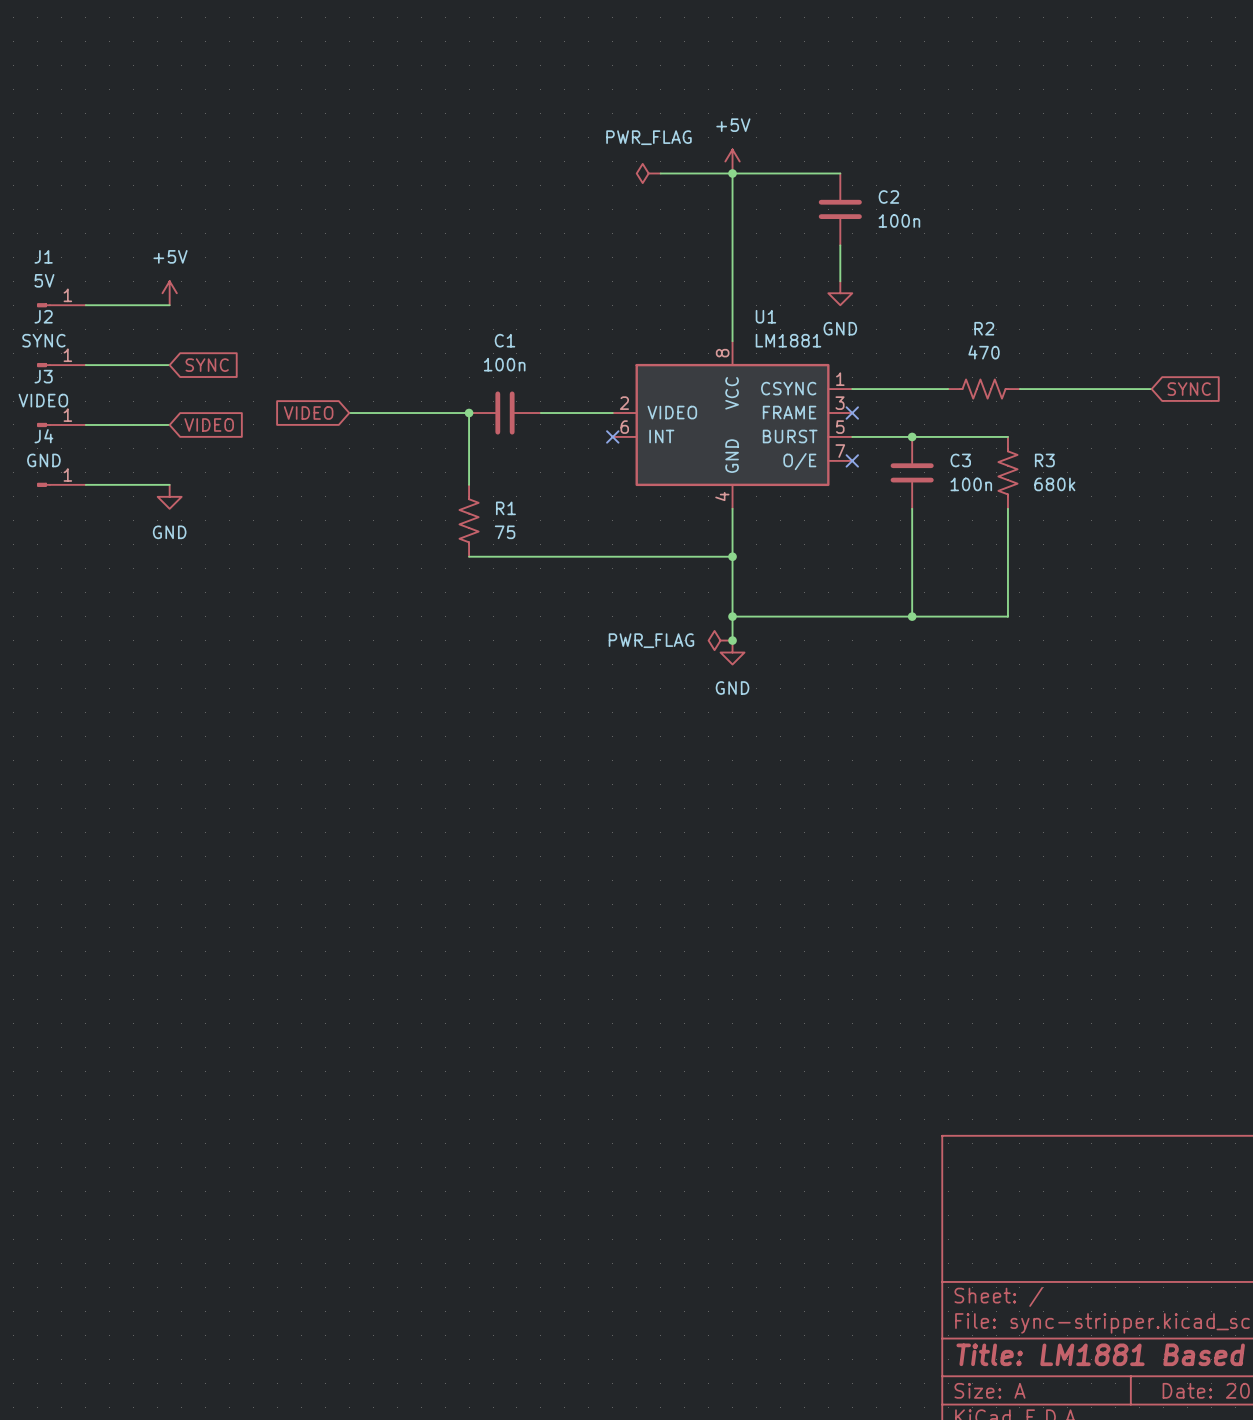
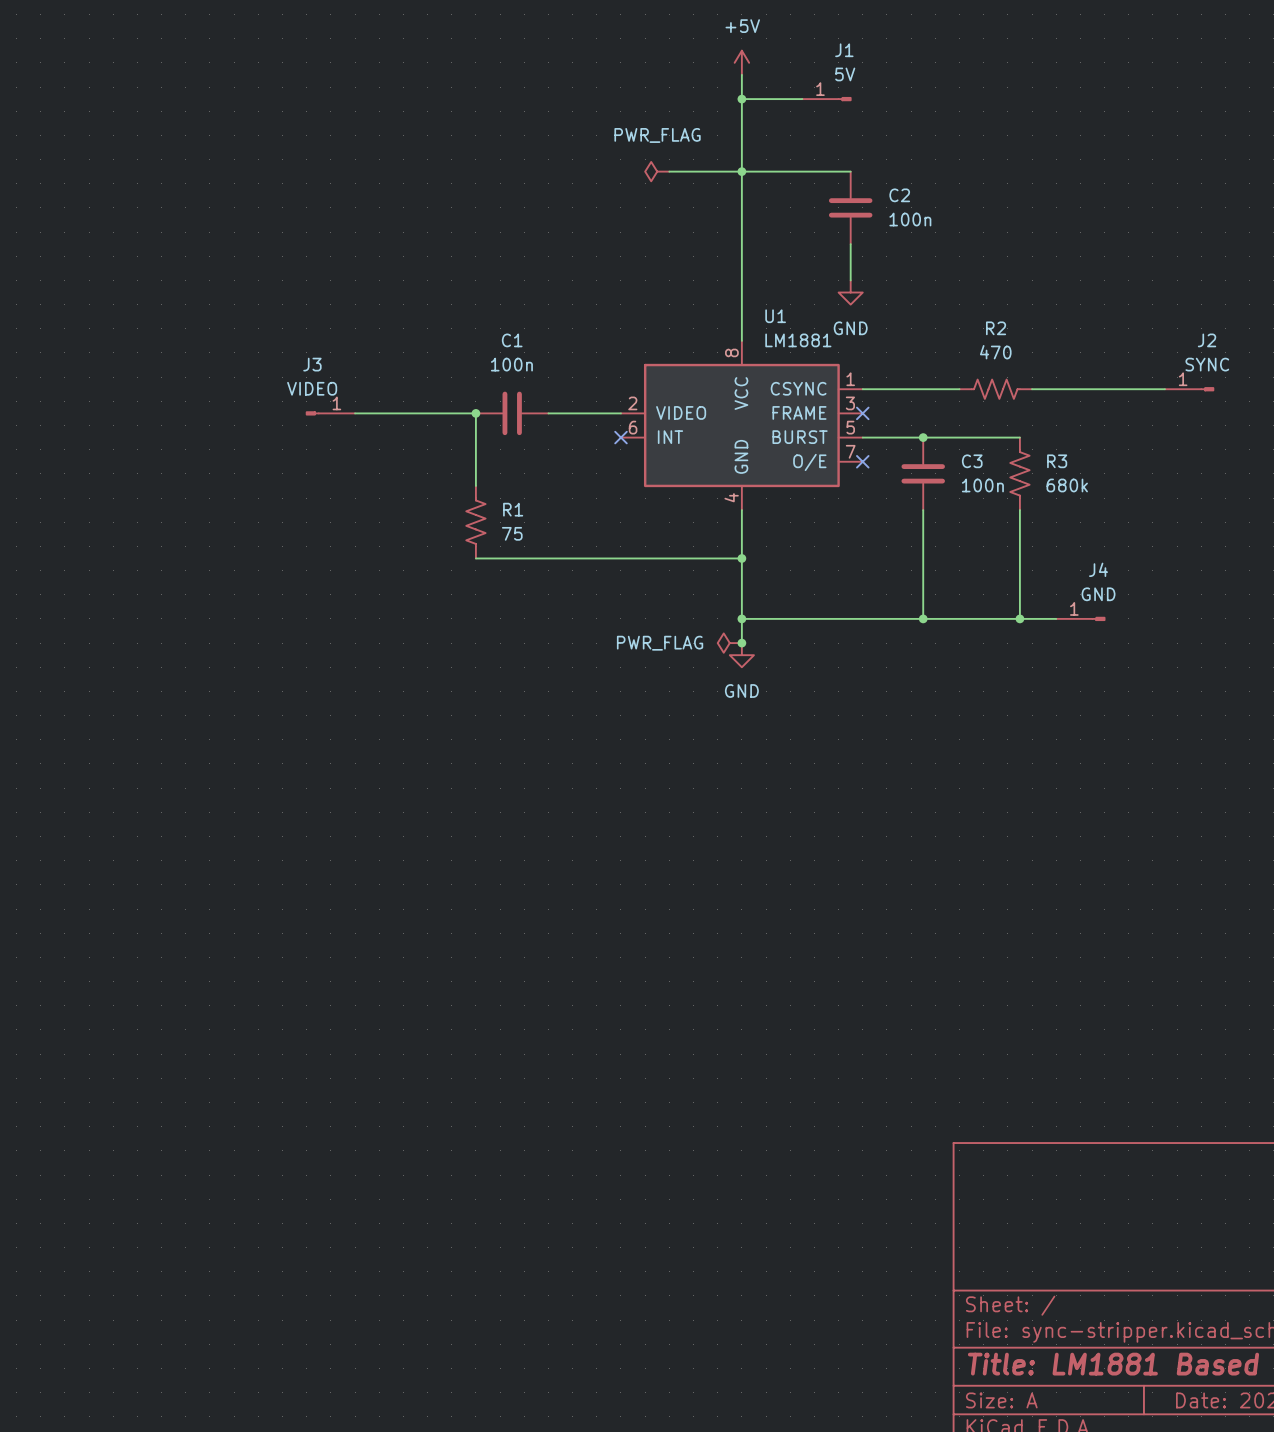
wire: none -> (741, 74) (741, 171)
wire: none -> (741, 99) (802, 99)
junction: none -> (741, 99)
power symbol position: +5V (732, 161) -> +5V (741, 62)
J1 name position: J1 (43, 256) -> J1 (844, 50)
J1 value position: 5V (44, 280) -> 5V (845, 74)
power symbol: +5V (169, 293) -> none
J1 rotation: 0° (43, 305) -> 180° (844, 99)
J1 position: (61, 305) -> (826, 99)
wire: (85, 305) (169, 305) -> none
J2 name position: J2 (43, 316) -> J2 (1207, 340)
J2 value position: SYNC (43, 340) -> SYNC (1207, 364)
J2 rotation: 0° (43, 365) -> 180° (1207, 389)
J2 position: (61, 365) -> (1189, 389)
wire: (85, 365) (169, 365) -> none
global label: SYNC (207, 365) -> none
global label: SYNC (1189, 389) -> none
global label: VIDEO (308, 413) -> none
J3 position: (61, 424) -> (330, 413)
wire: (85, 424) (169, 424) -> none
global label: VIDEO (209, 424) -> none
J4 name position: J4 (43, 436) -> J4 (1098, 569)
J4 value position: GND (43, 460) -> GND (1098, 594)
J4 rotation: 0° (43, 484) -> 180° (1098, 618)
J4 position: (61, 484) -> (1080, 618)
wire: (85, 484) (169, 484) -> none
power symbol: GND (169, 496) -> none
wire: none -> (1019, 618) (1056, 618)
junction: none -> (1019, 618)

